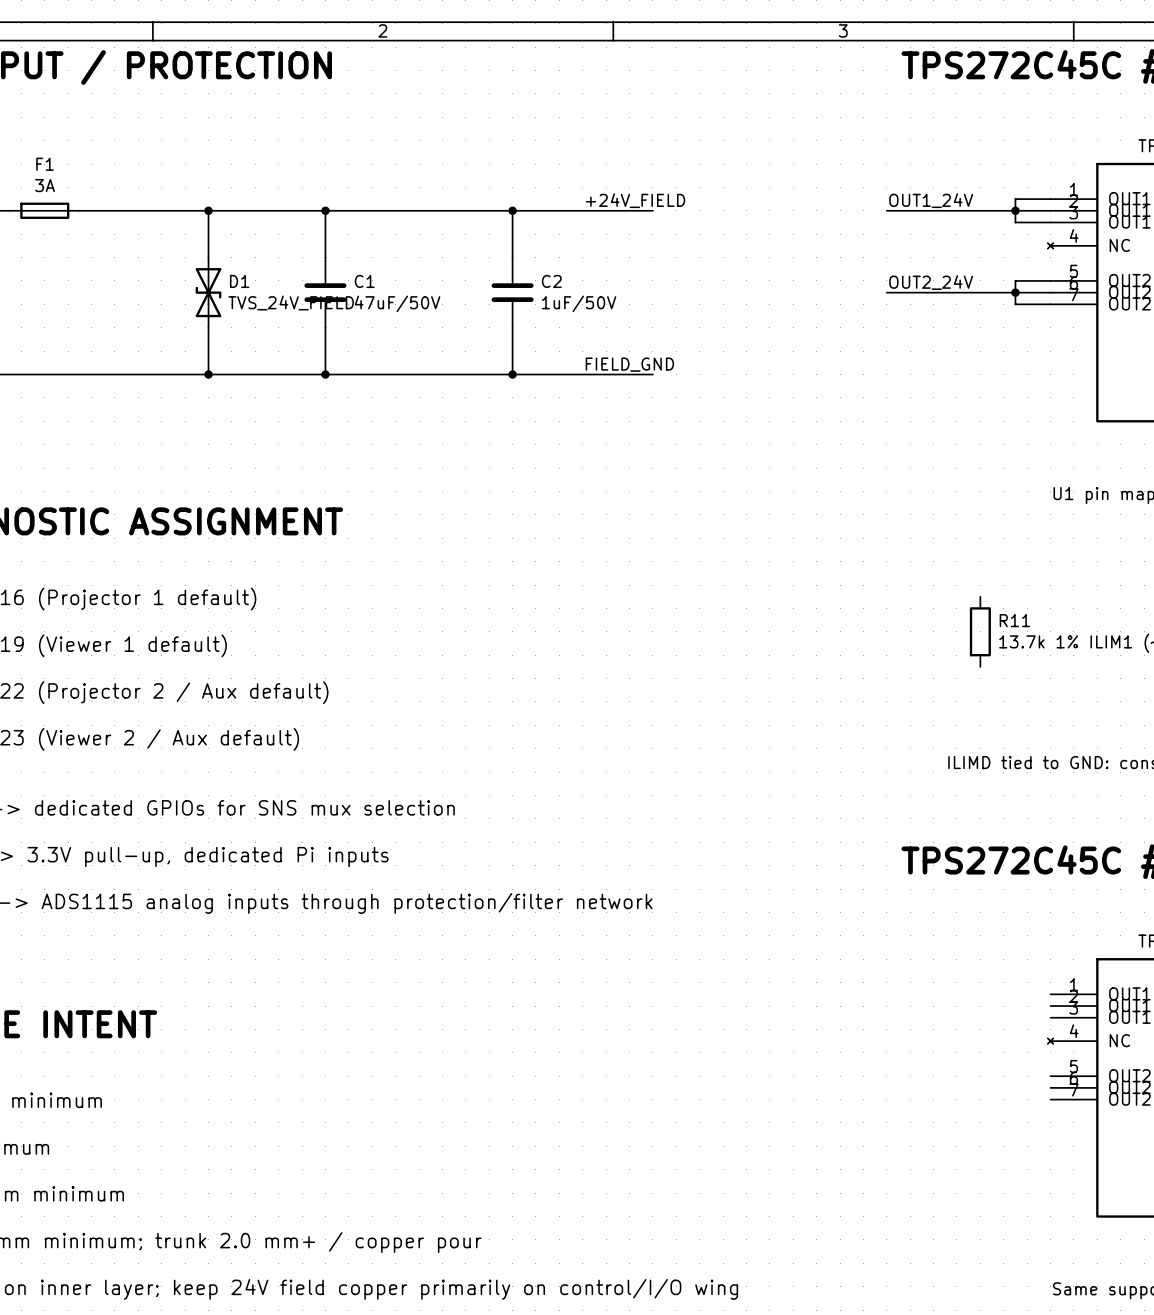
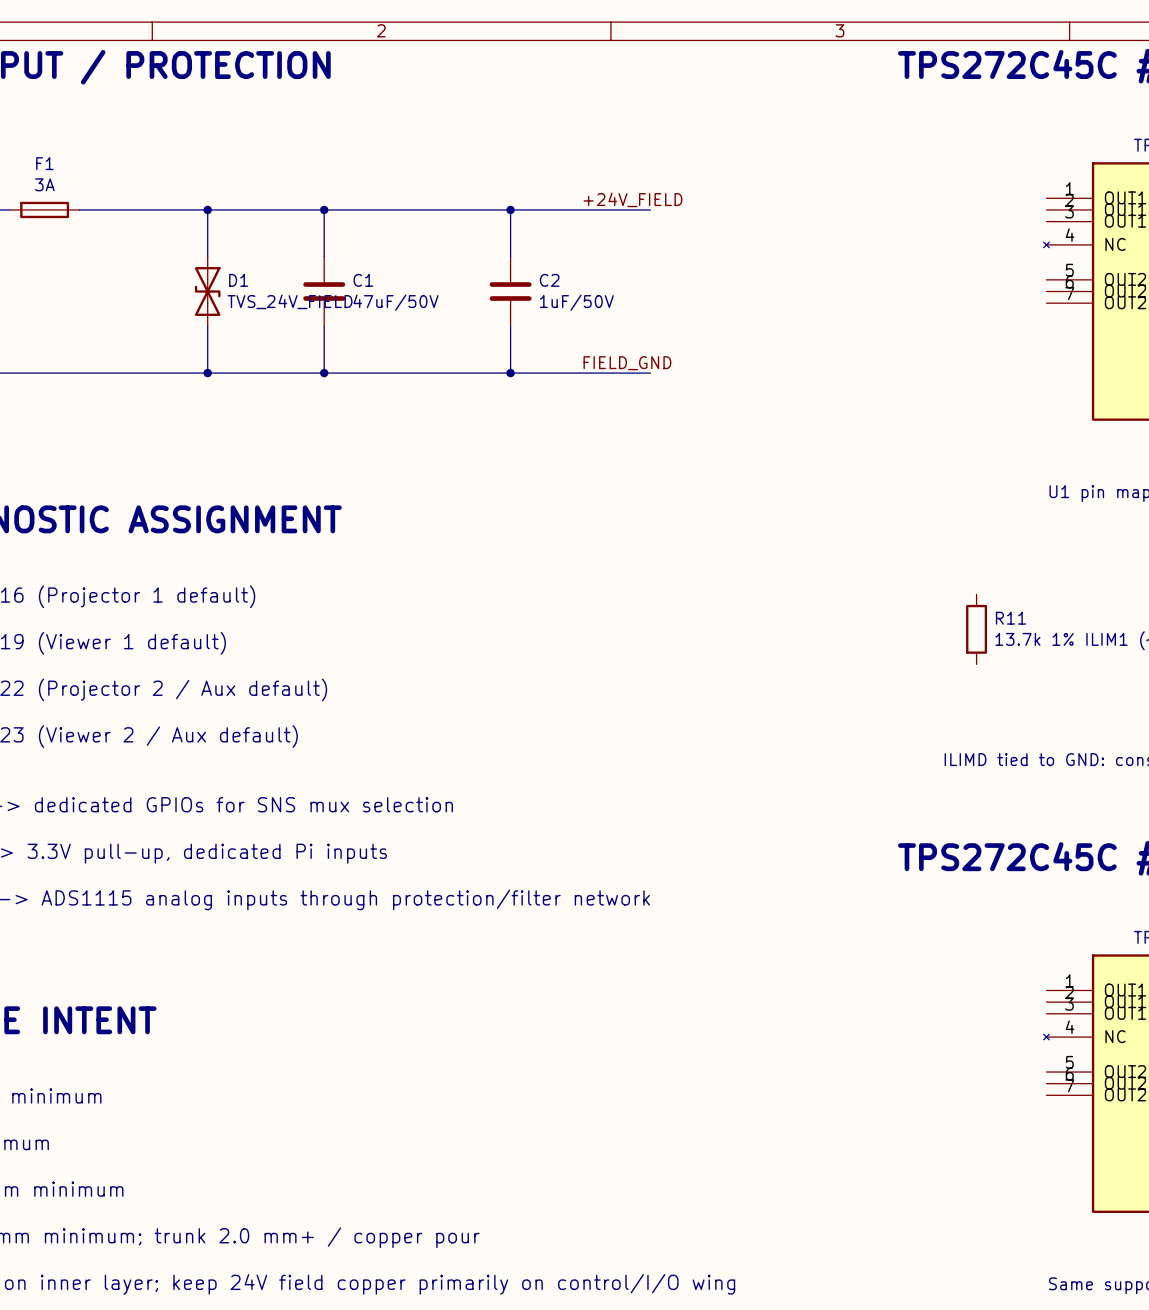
wire: (1050, 199) (1015, 199) (1015, 222) (1050, 222) -> none
label: OUT1_24V (931, 200) -> none
wire: (886, 210) (1050, 210) -> none
junction: (1015, 210) -> none
wire: (1050, 280) (1015, 280) (1015, 304) (1050, 304) -> none
label: OUT2_24V (931, 282) -> none
wire: (886, 292) (1050, 292) -> none
junction: (1015, 292) -> none

